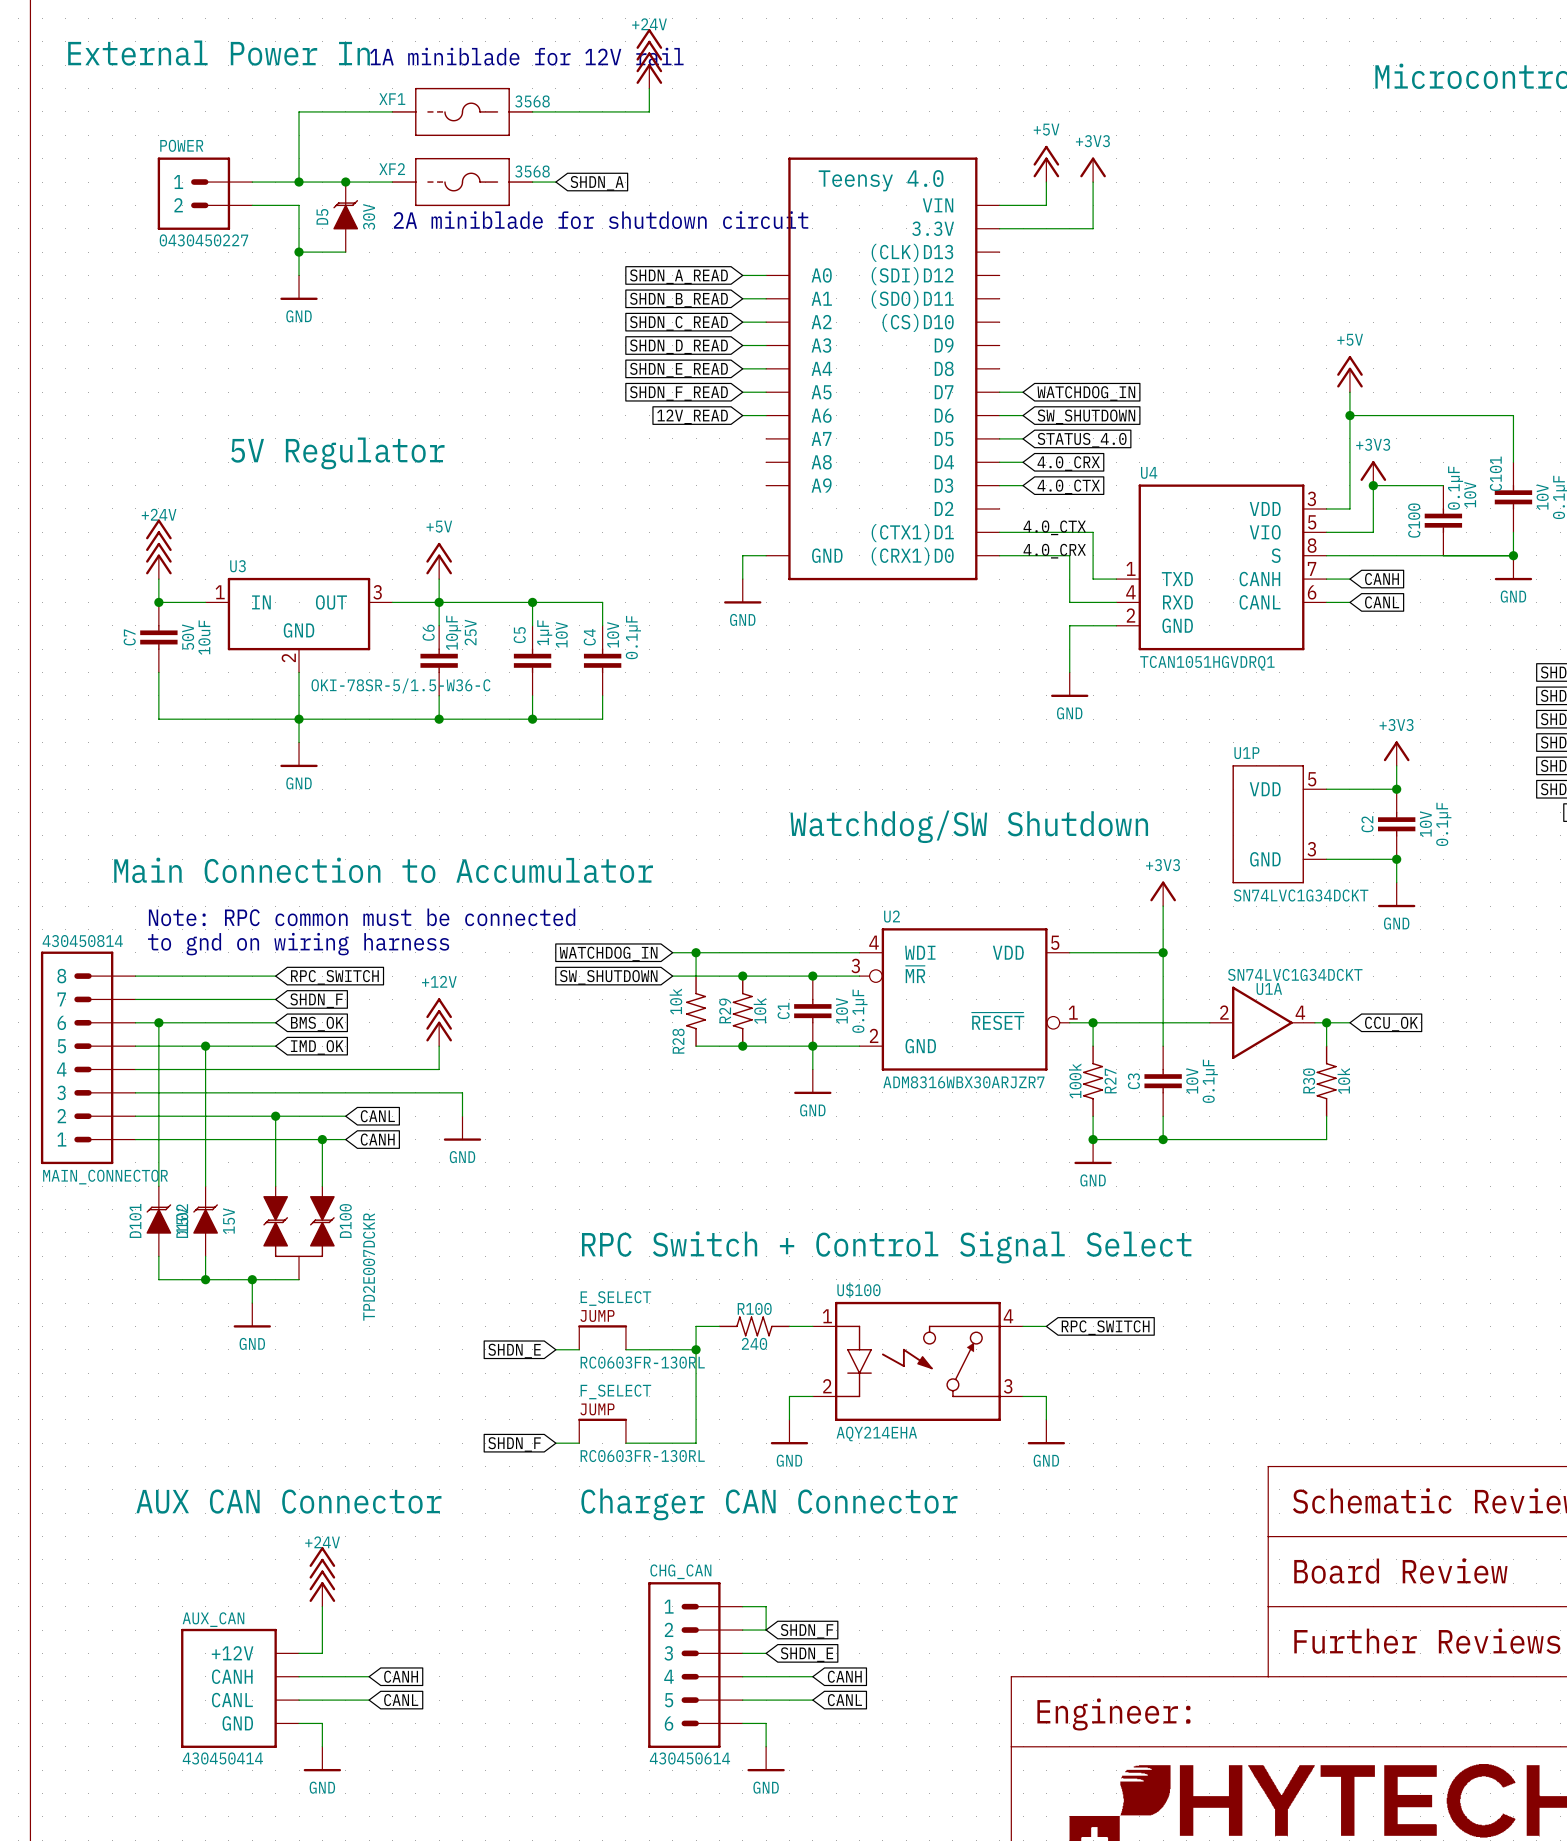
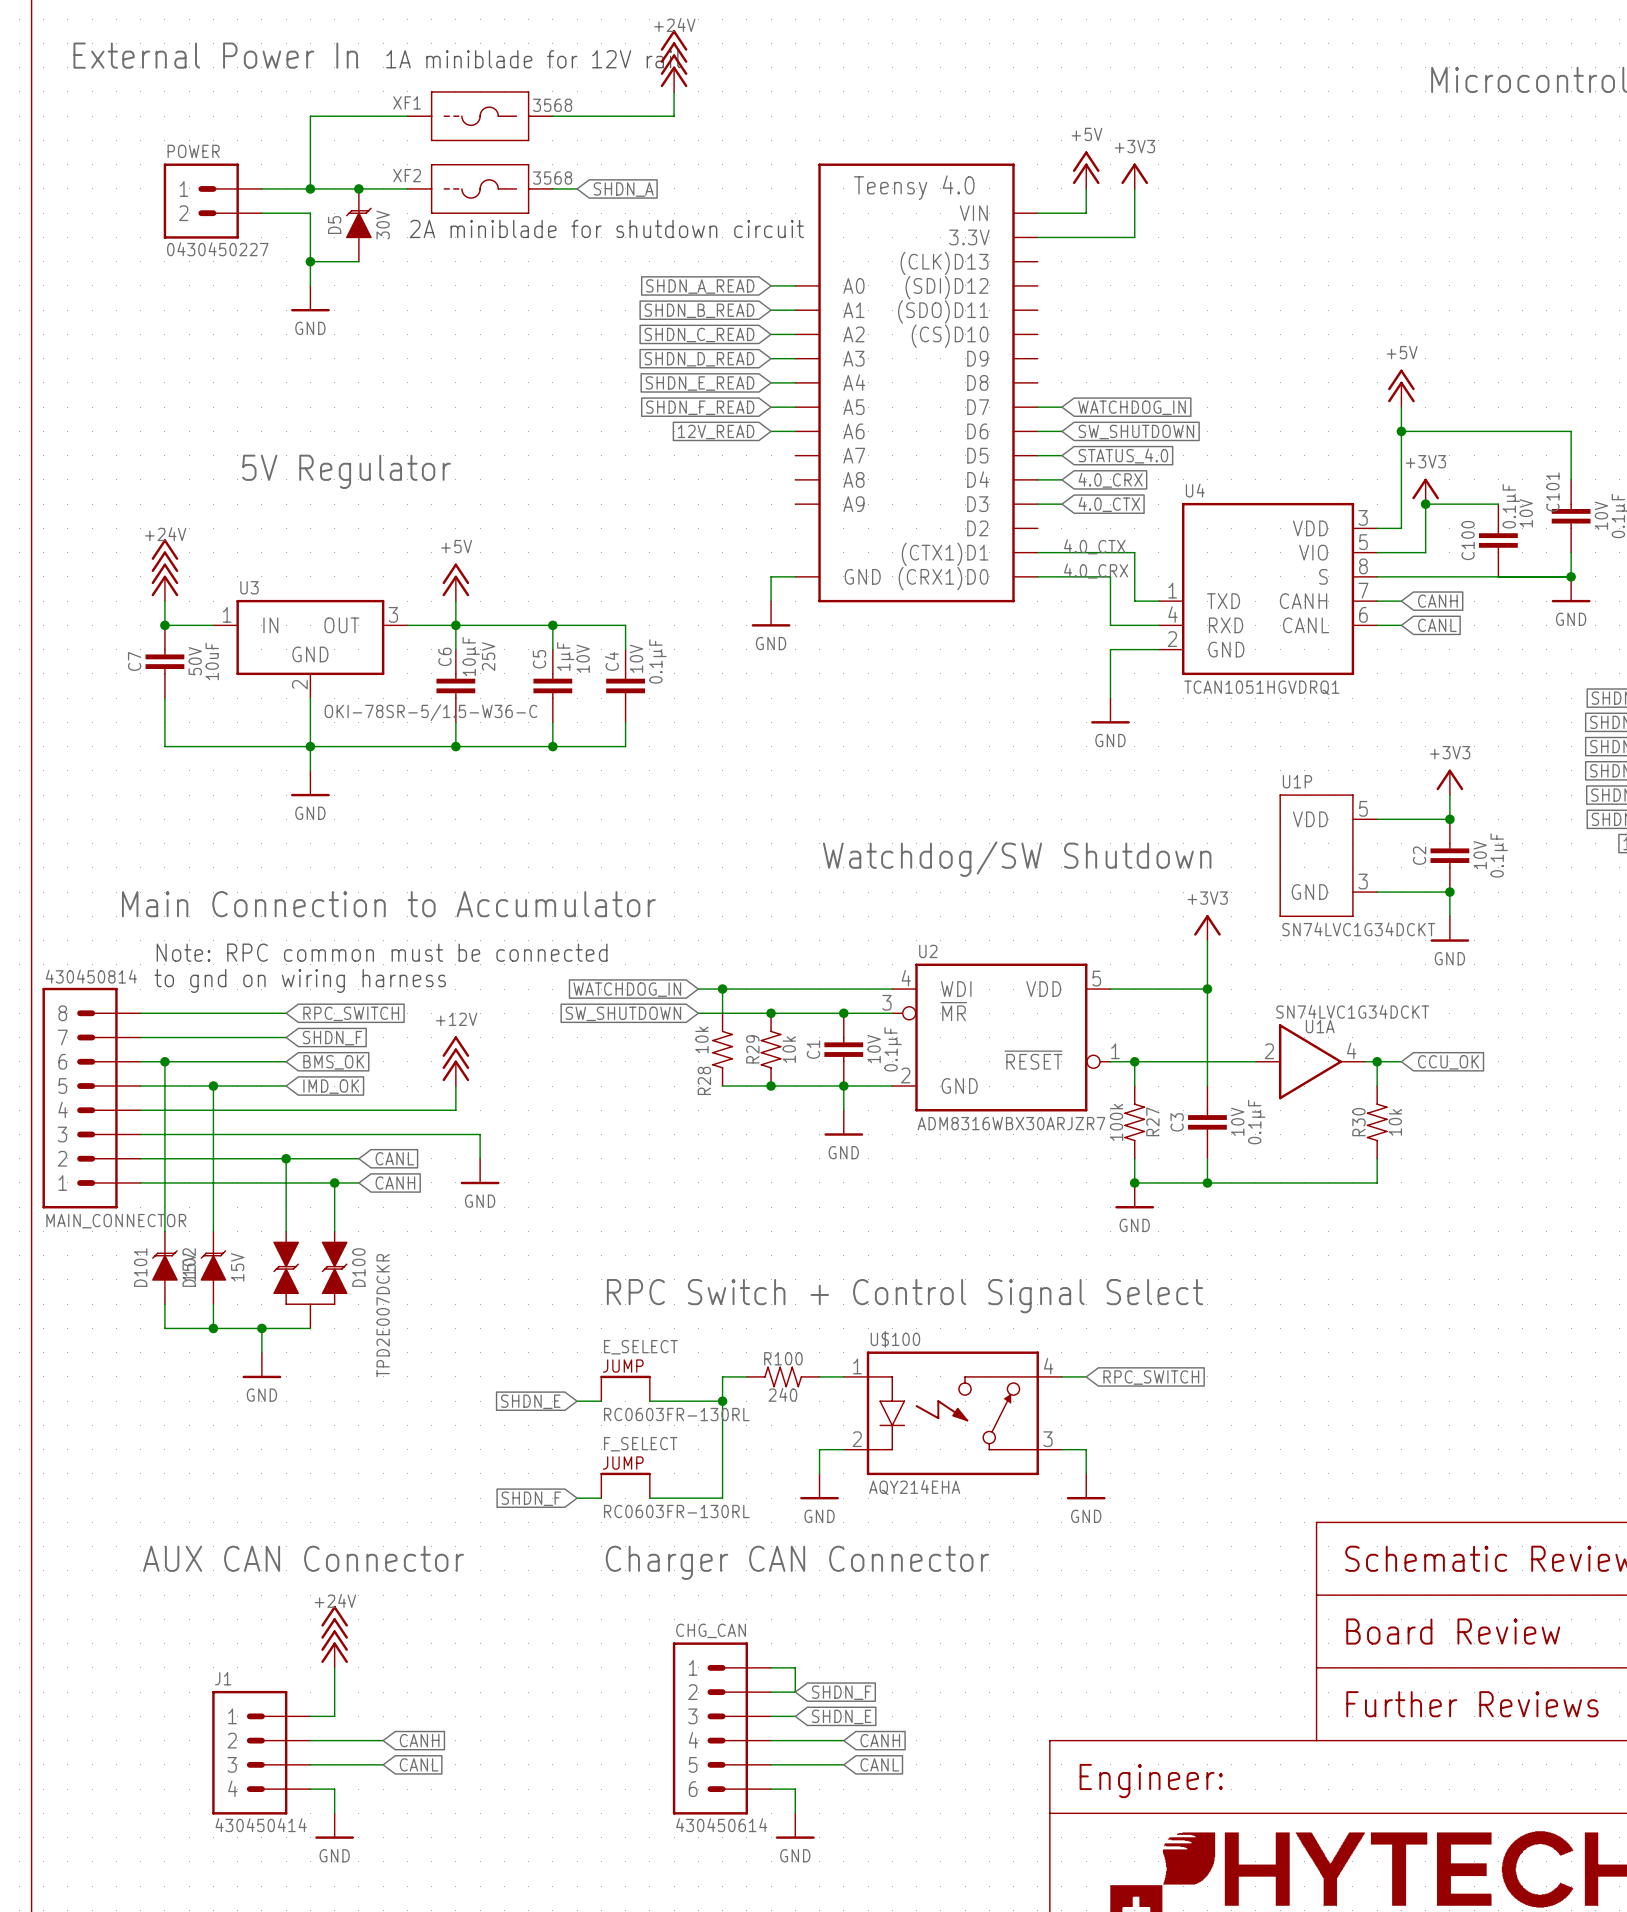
AUX_CAN: (240, 1688) -> none
J1: none -> (261, 1752)

